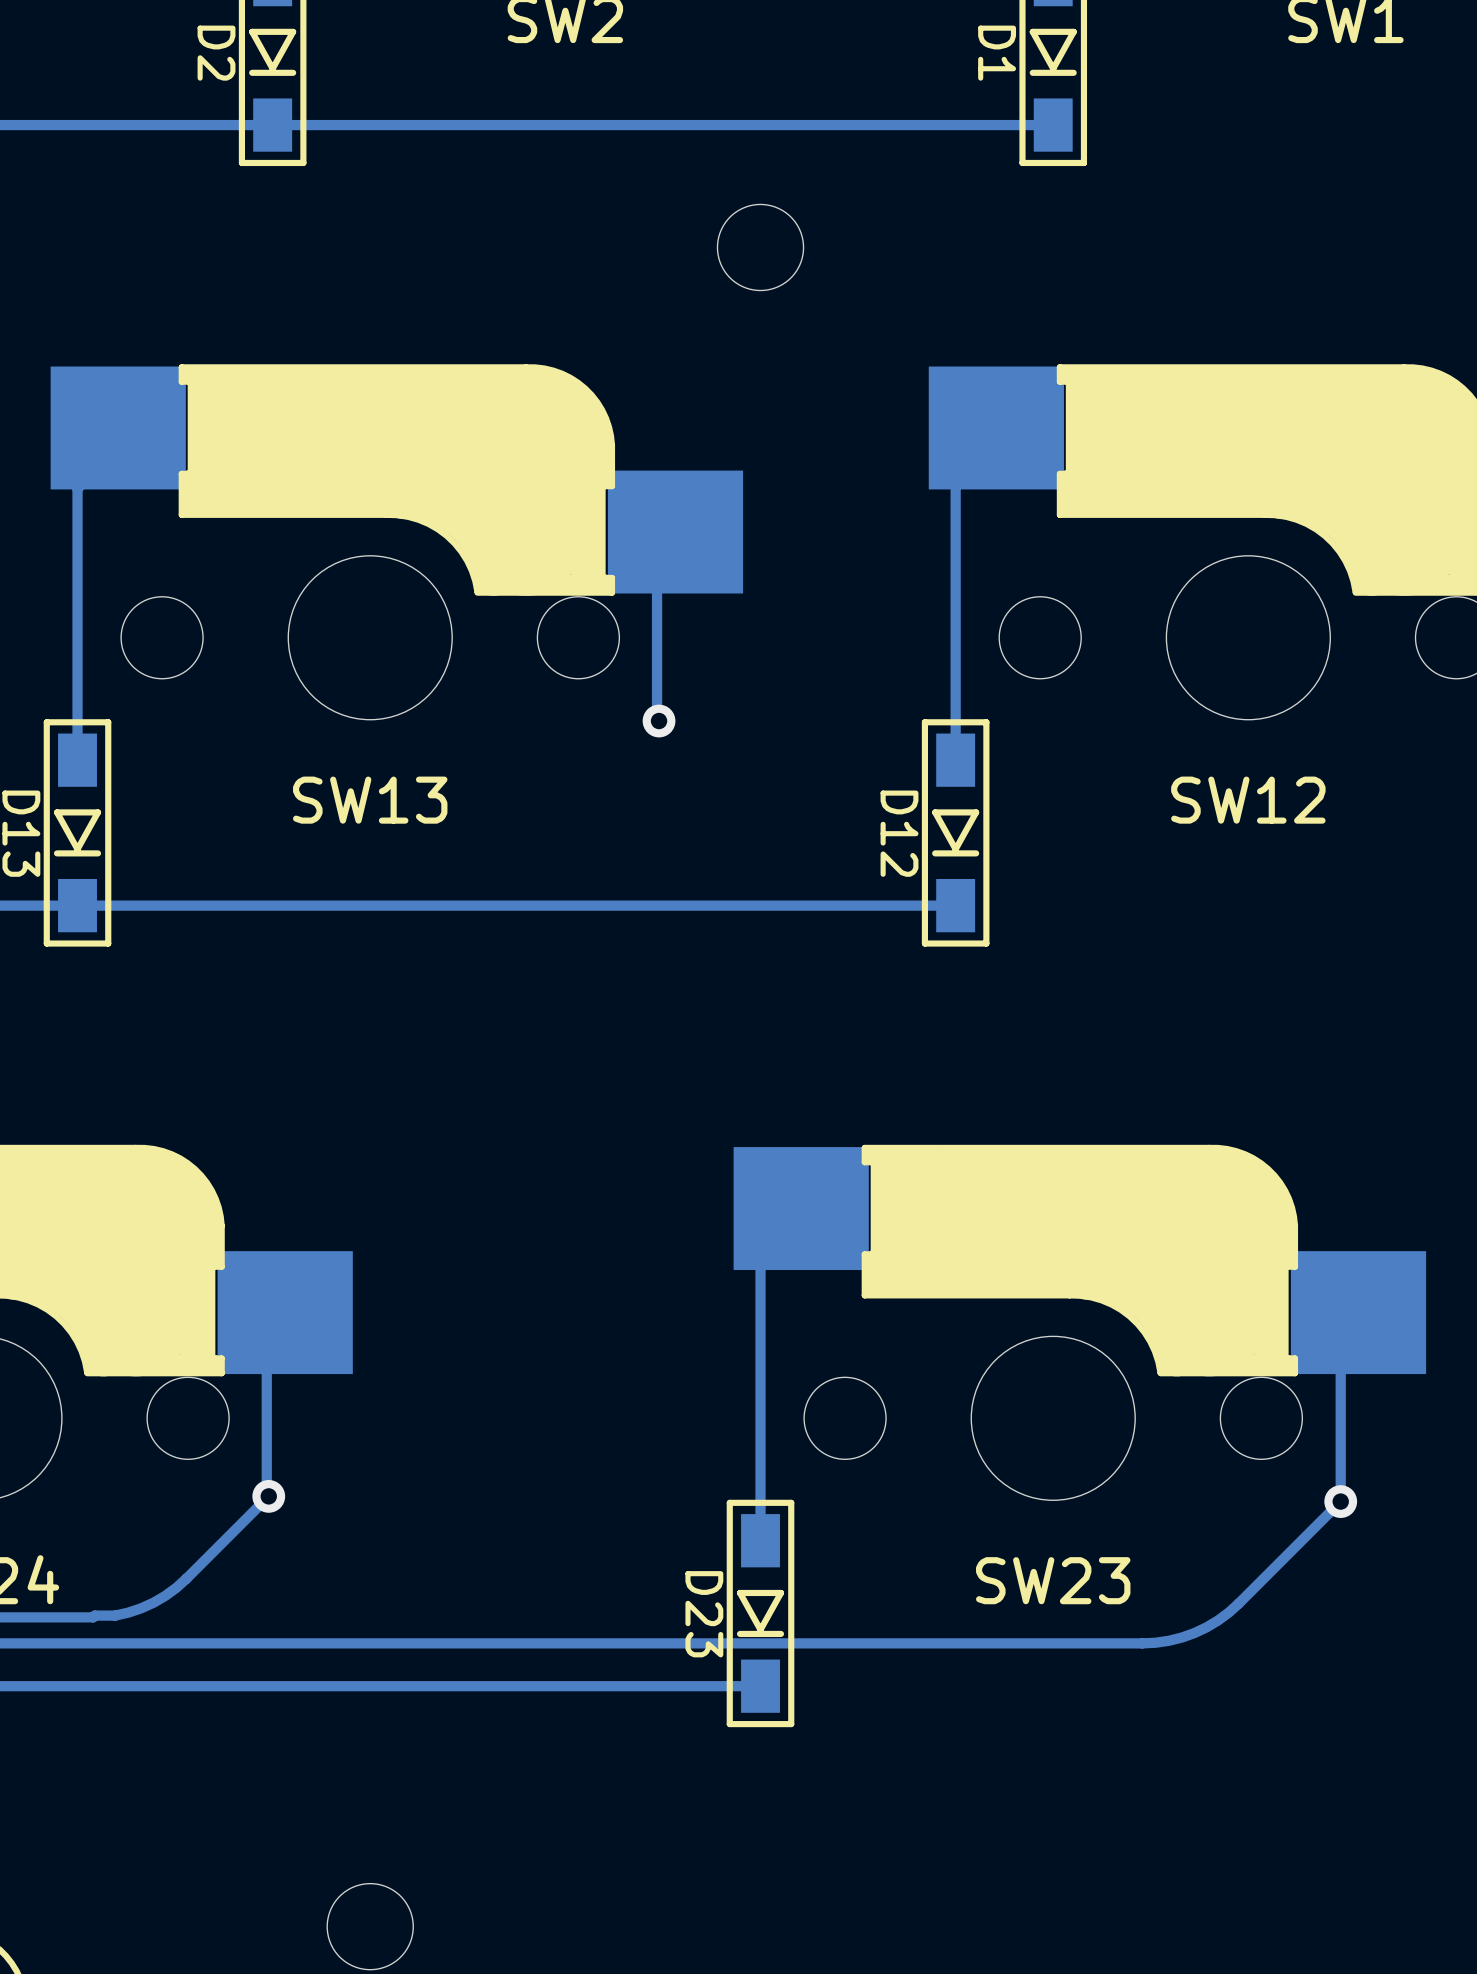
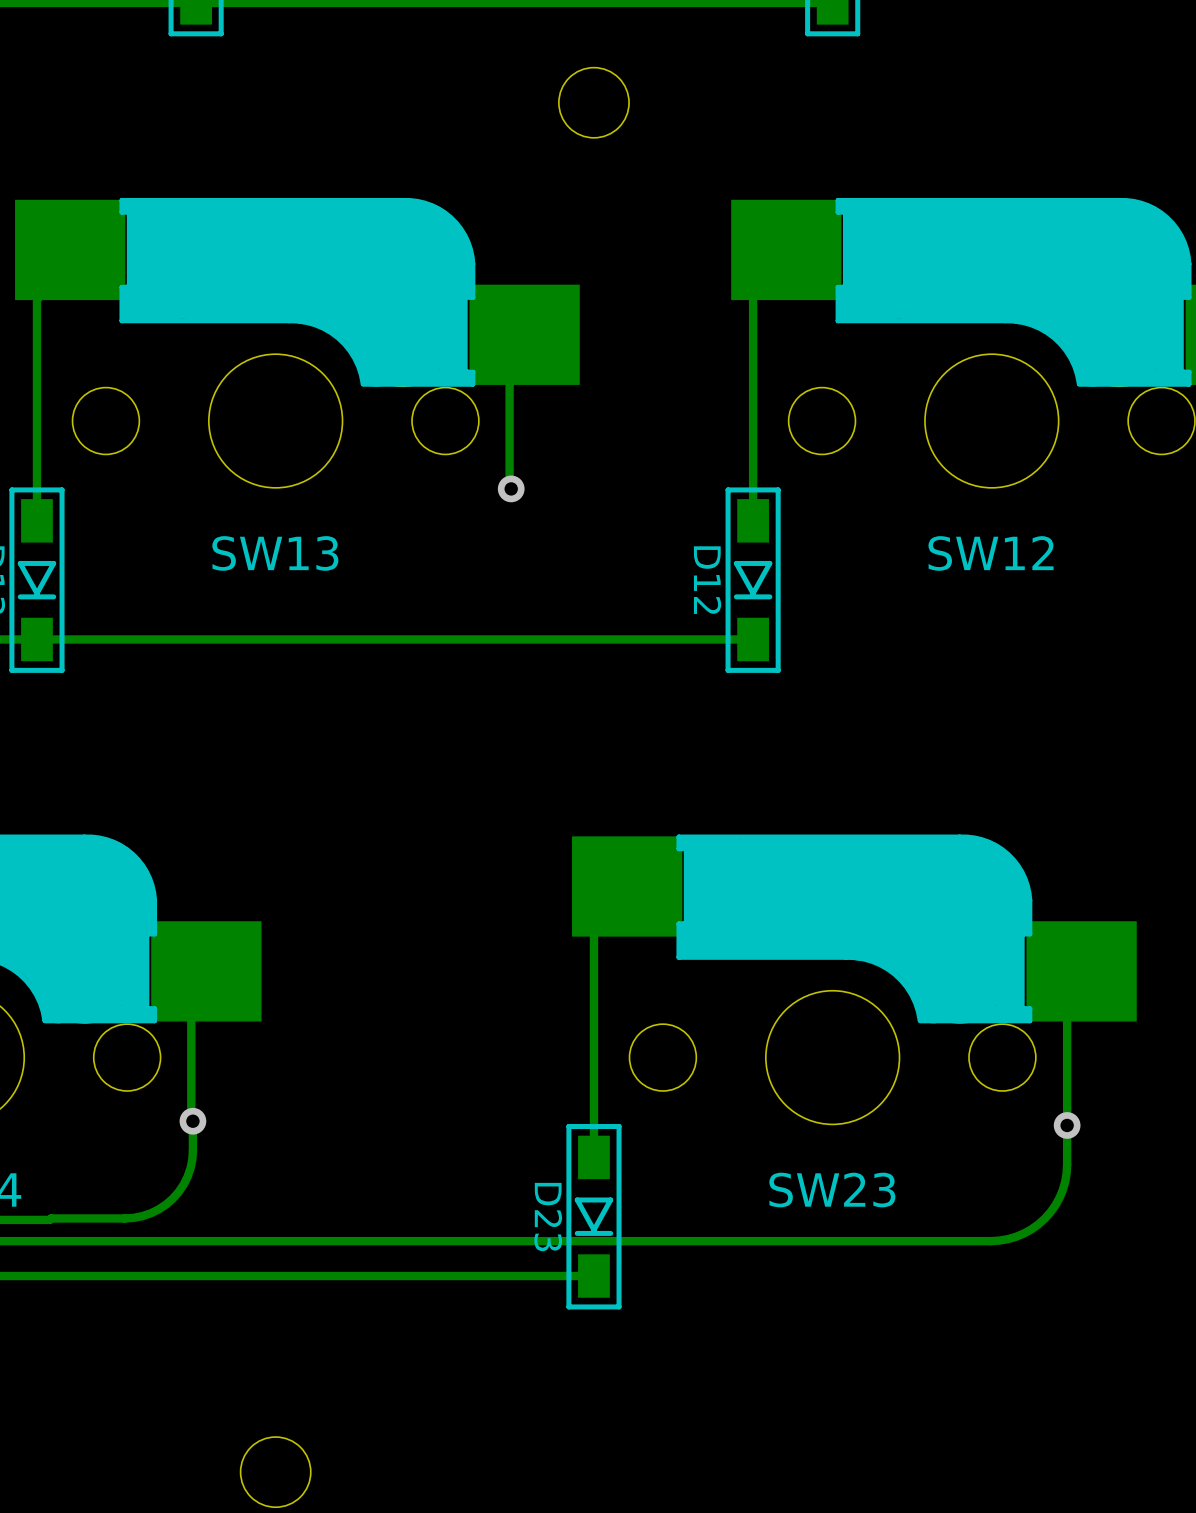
track: (268, 1496) (176, 1587) (153, 1602) (115, 1615) -> (192, 1121) (190, 1167) (178, 1191) (166, 1204) (150, 1213) (133, 1217) (67, 1218)
track: (1340, 1501) (1238, 1603) (1218, 1620) (1182, 1637) (1142, 1643) -> (1067, 1125) (1066, 1173) (1062, 1189) (1055, 1205) (1038, 1224) (1023, 1233) (999, 1240) (905, 1241)

